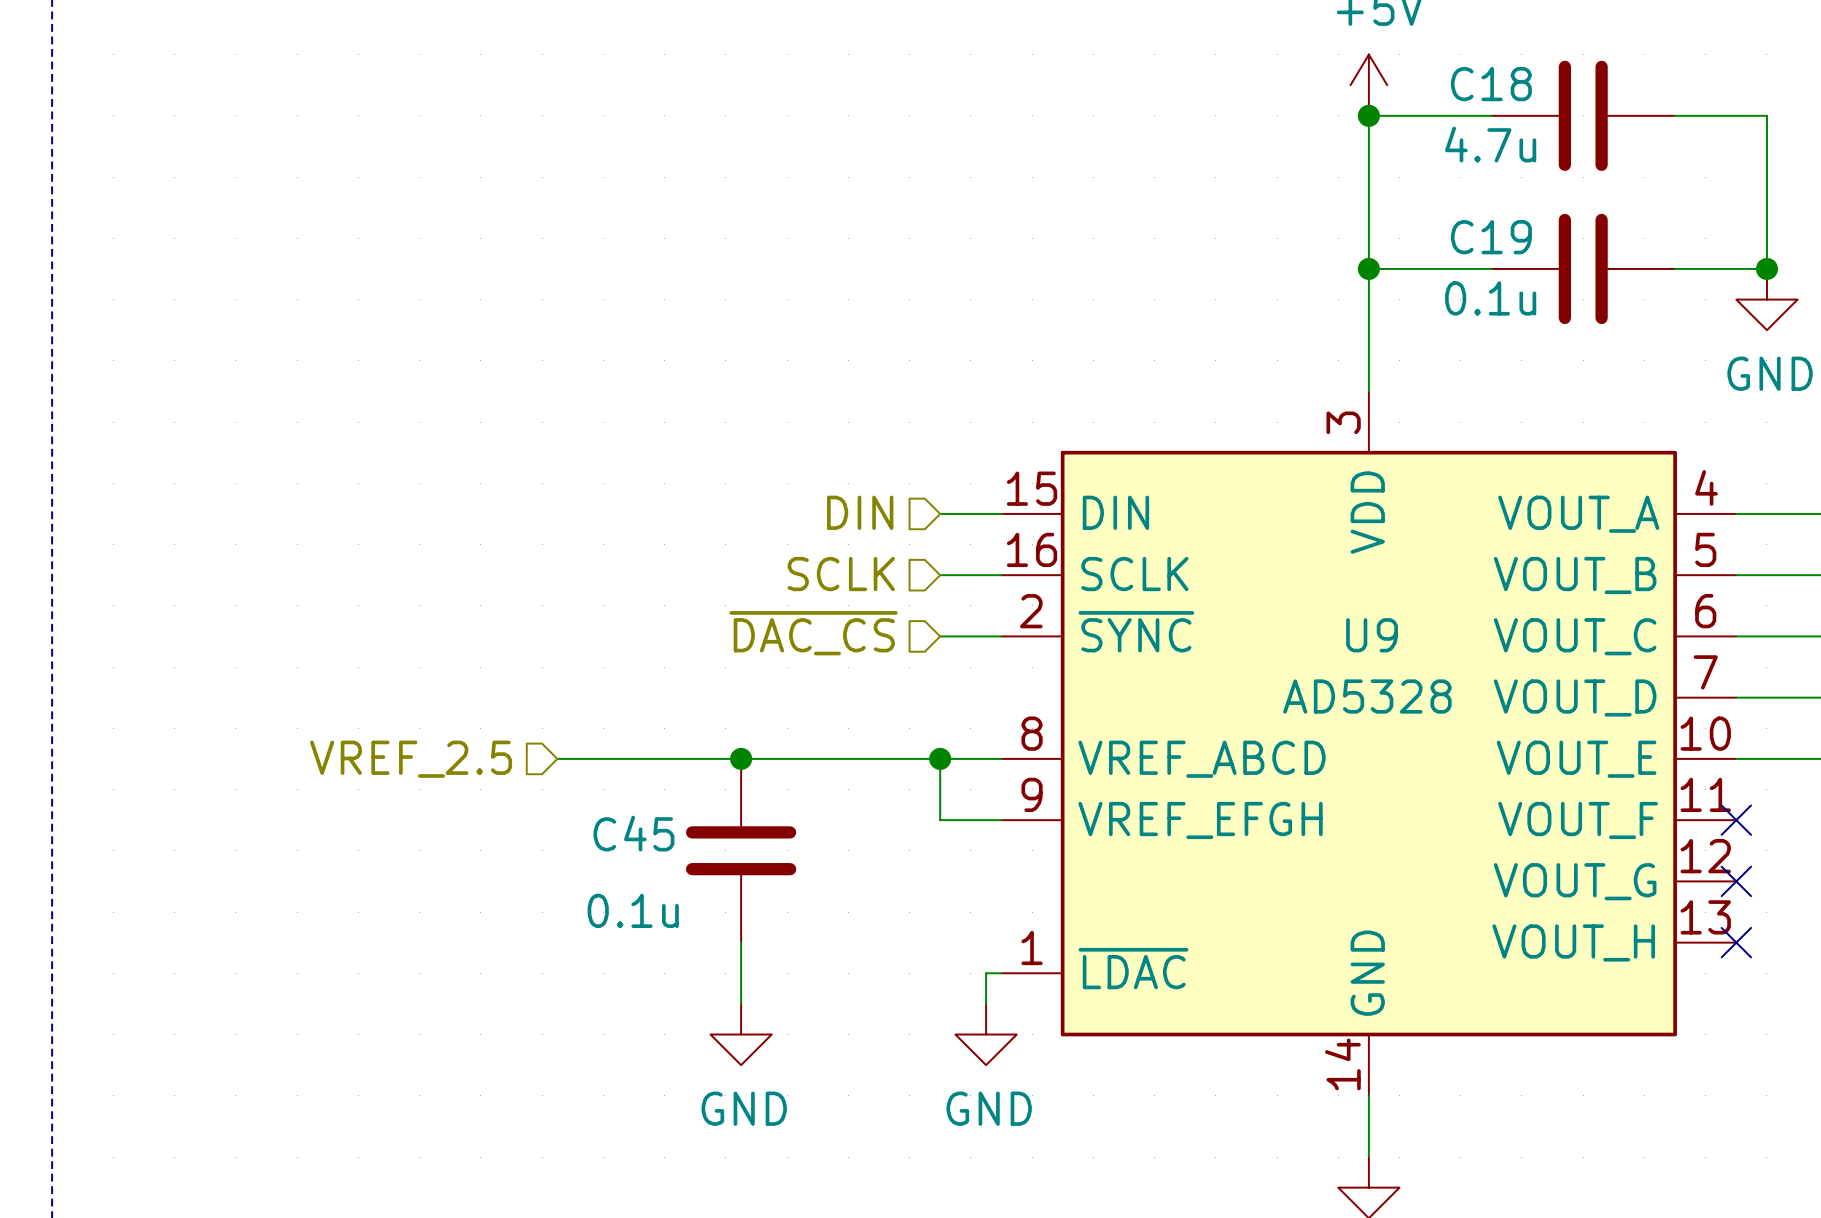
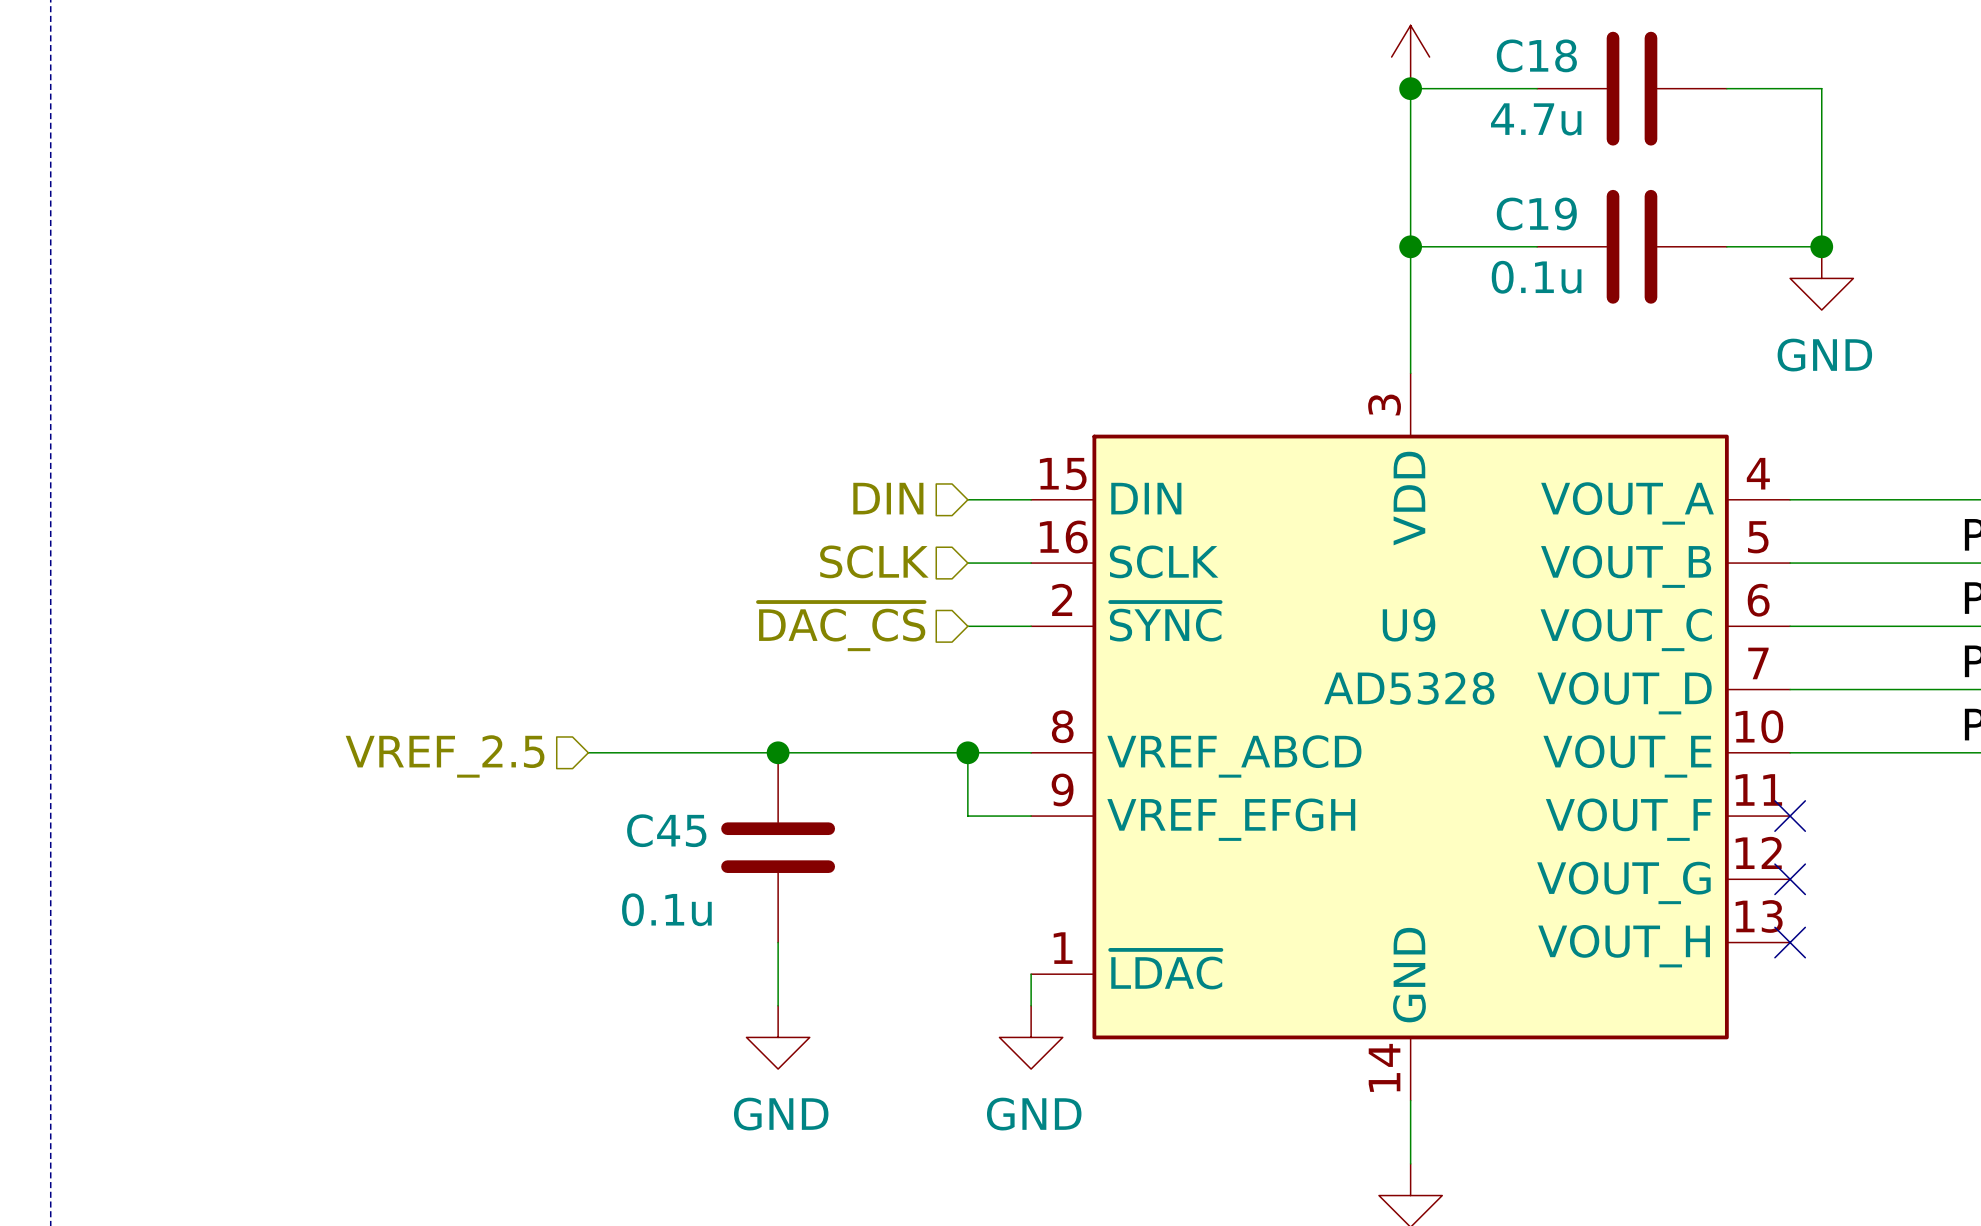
wire: (557, 758) (572, 758) -> none
junction position: (741, 758) -> (778, 752)
hierarchical label position: VREF_2.5 (411, 759) -> VREF_2.5 (445, 756)
C45 position: (741, 850) -> (778, 847)
wire: (741, 942) (741, 1003) -> (778, 942) (778, 1005)
wire: (1001, 973) (986, 973) (986, 1003) -> (1031, 974) (1031, 1005)
power symbol position: GND (741, 1034) -> GND (778, 1037)
power symbol position: GND (986, 1034) -> GND (1031, 1037)

